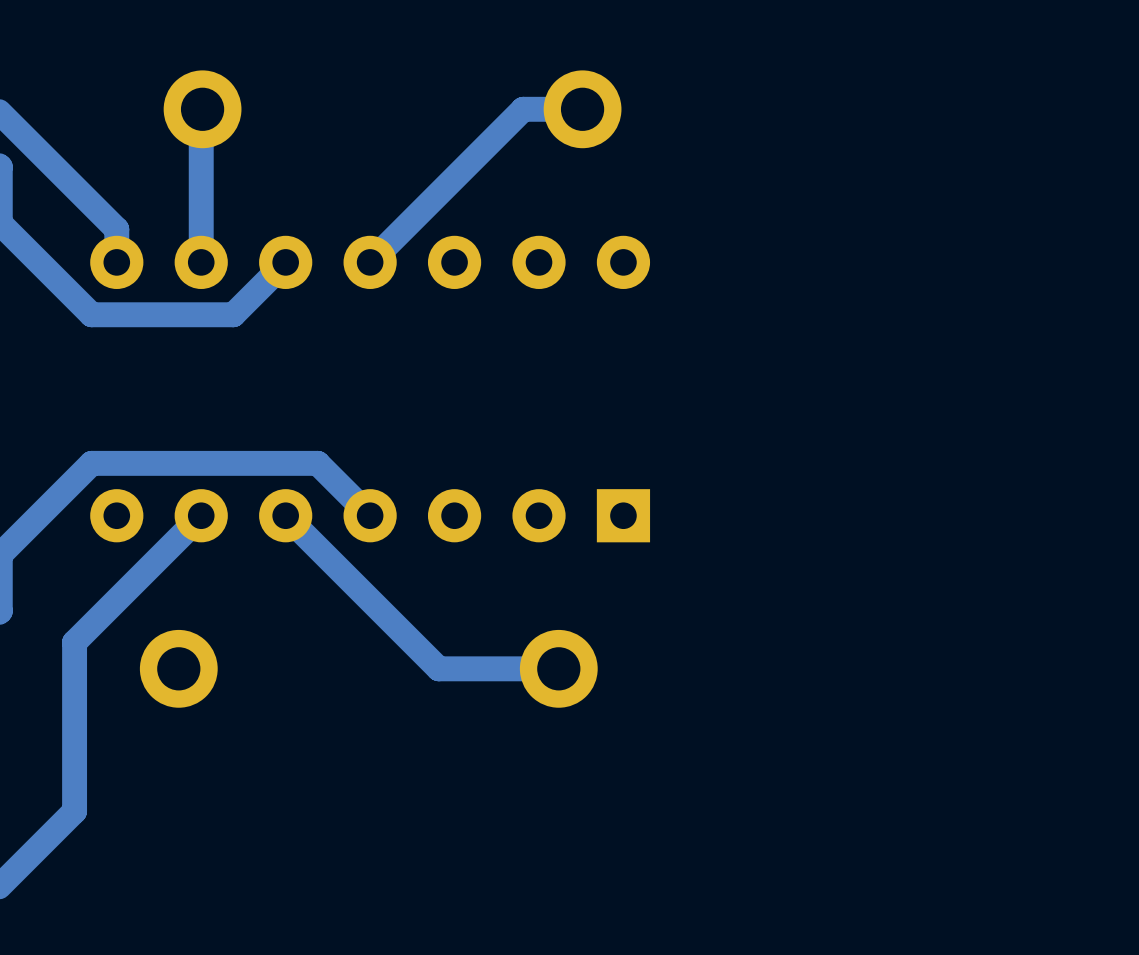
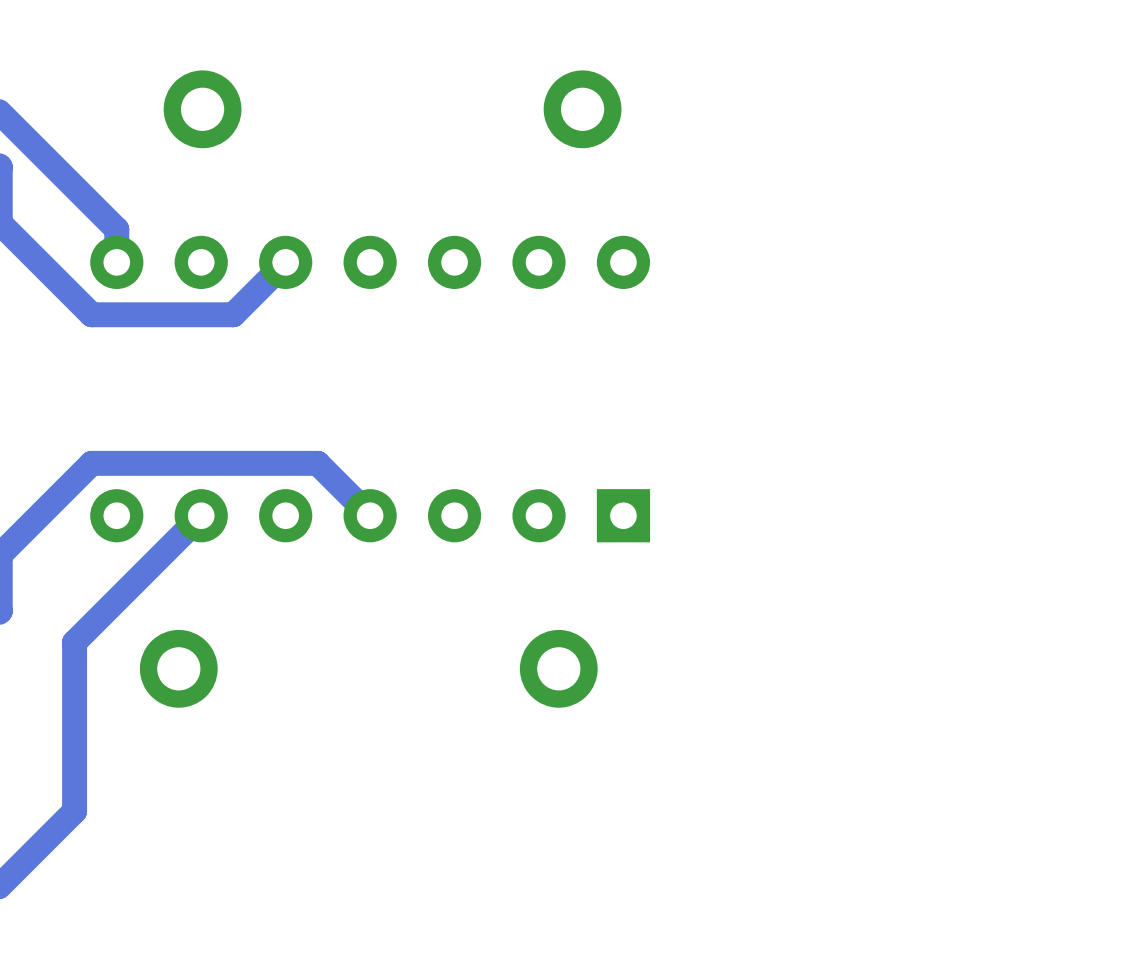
track: (202, 109) (201, 262) -> none
track: (582, 109) (523, 109) (370, 262) -> none
track: (285, 515) (438, 668) (558, 668) -> none

